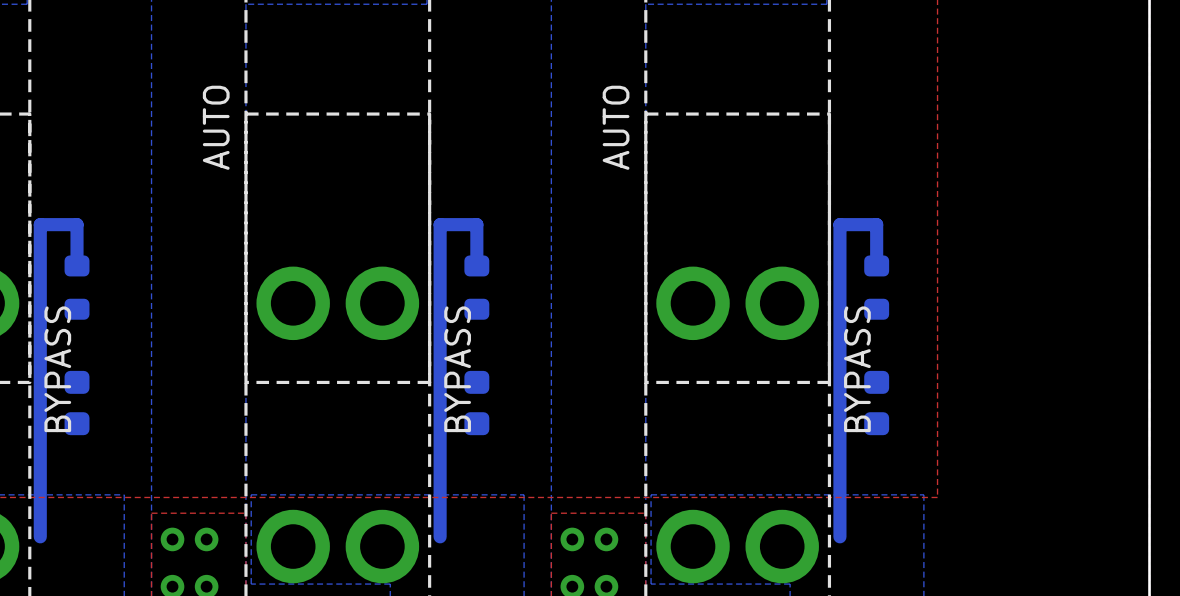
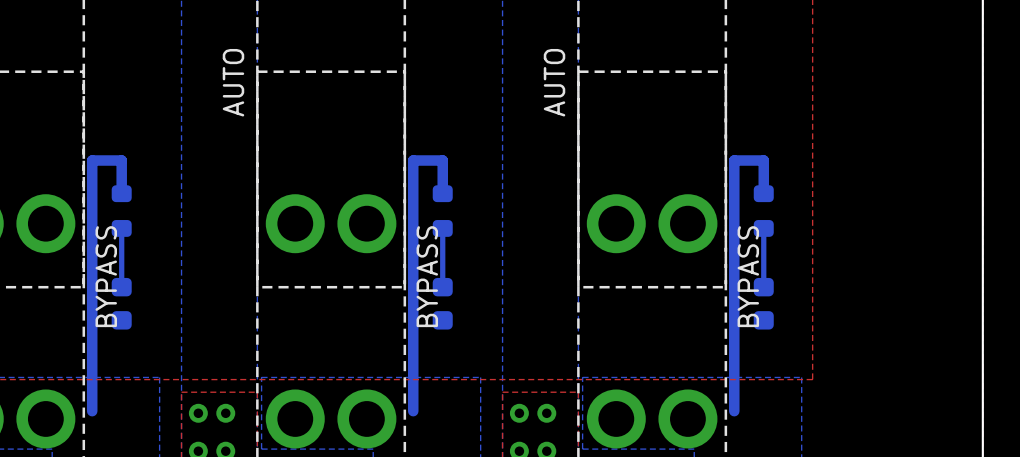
bottom track: none -> (121, 228) (121, 287)
bottom track: none -> (442, 228) (442, 287)
bottom track: none -> (763, 228) (763, 287)

